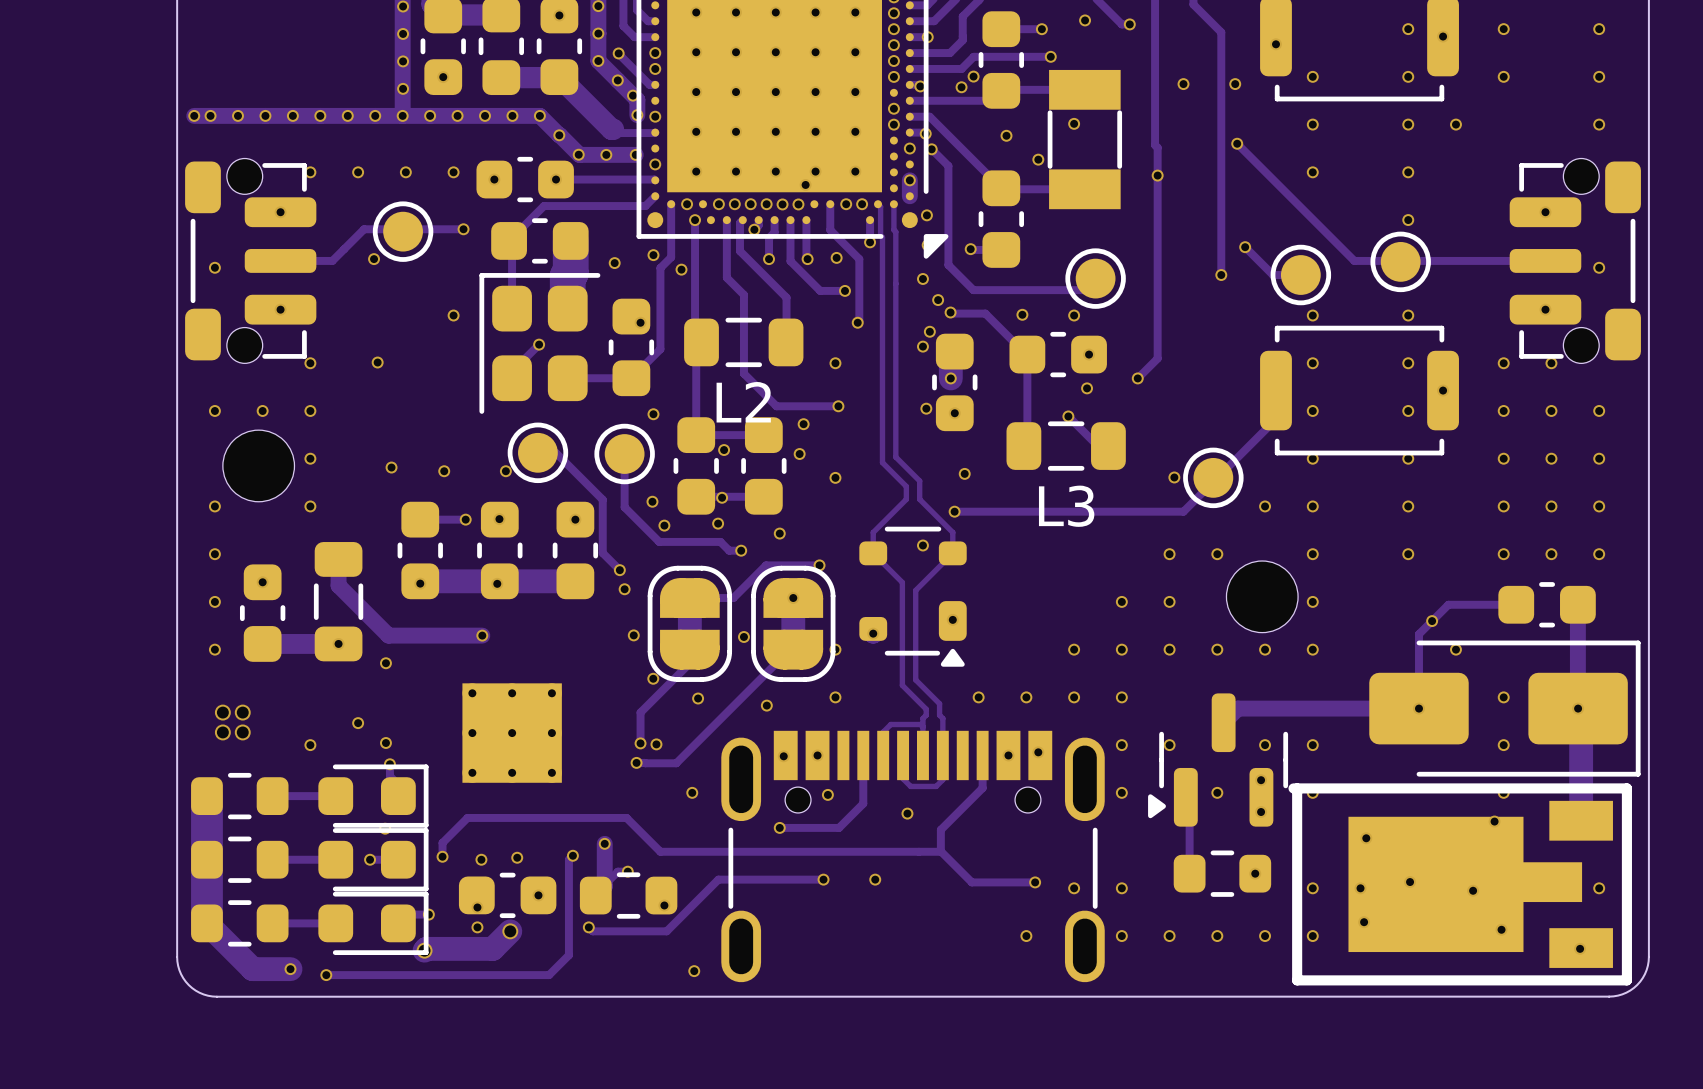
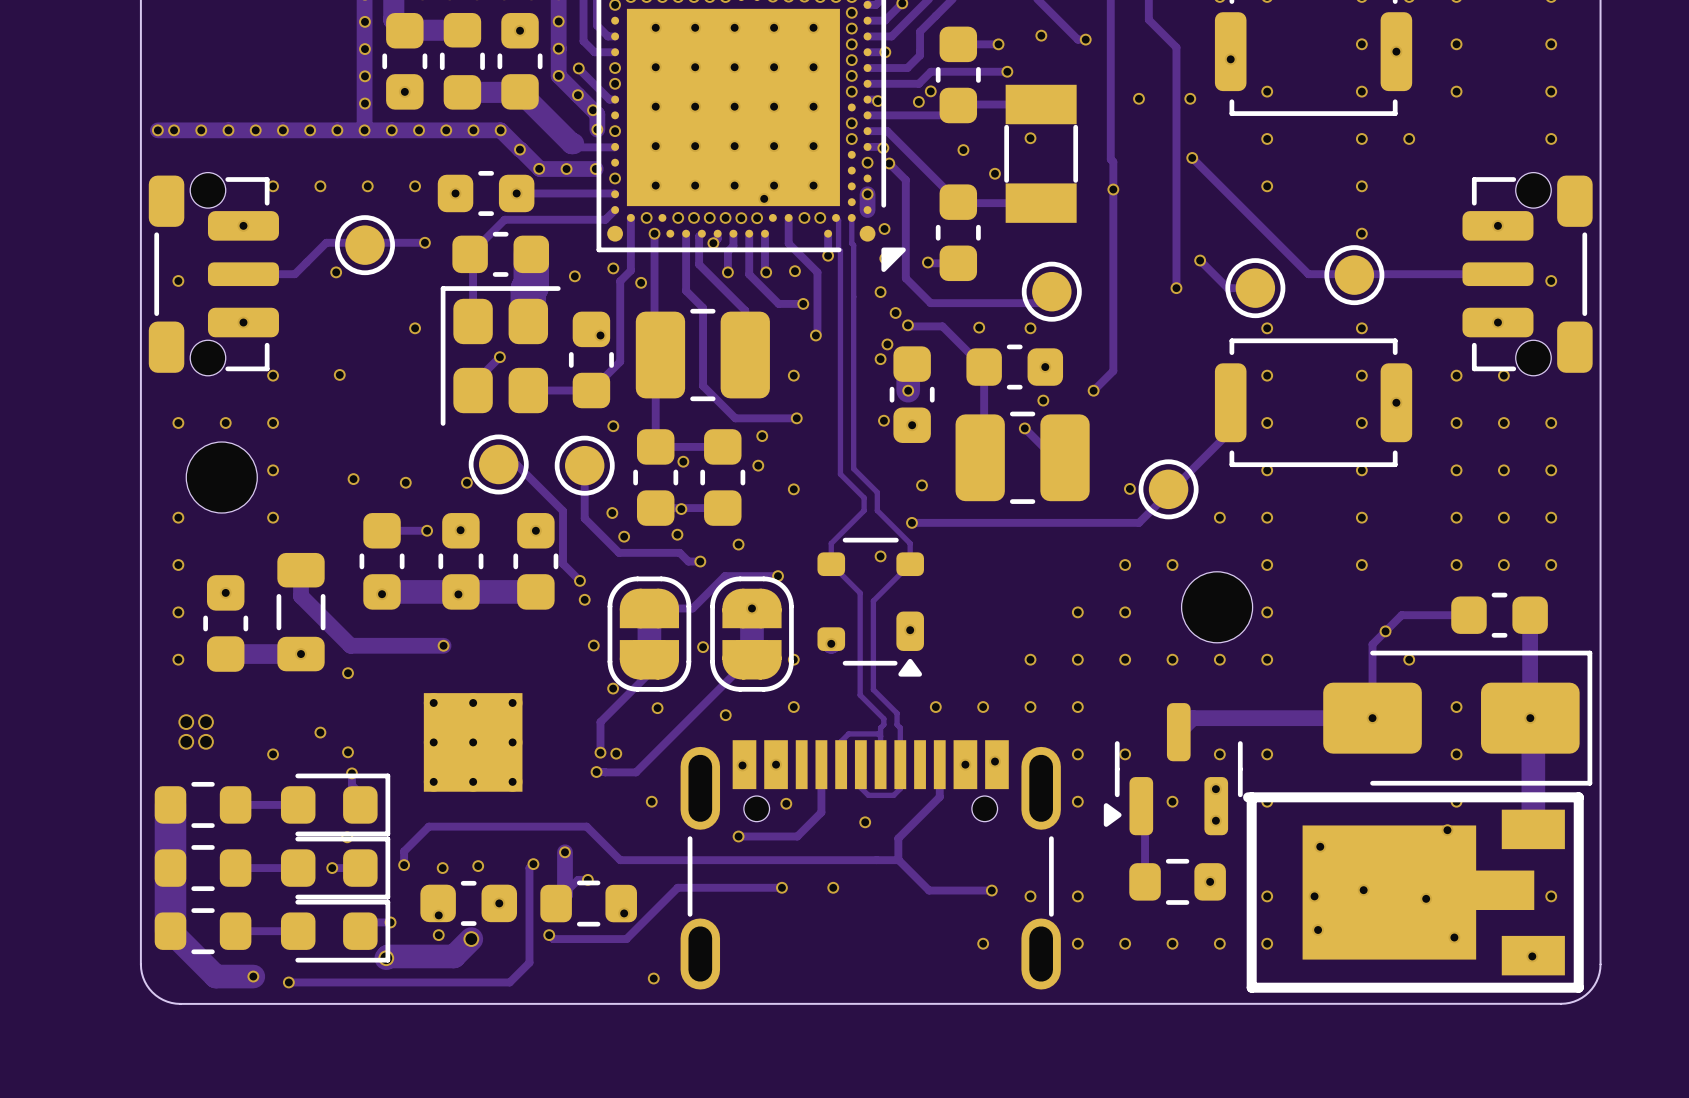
L2: (743, 342) -> none
part: none -> (702, 355)
L3: (1066, 446) -> none
part: none -> (1022, 457)

